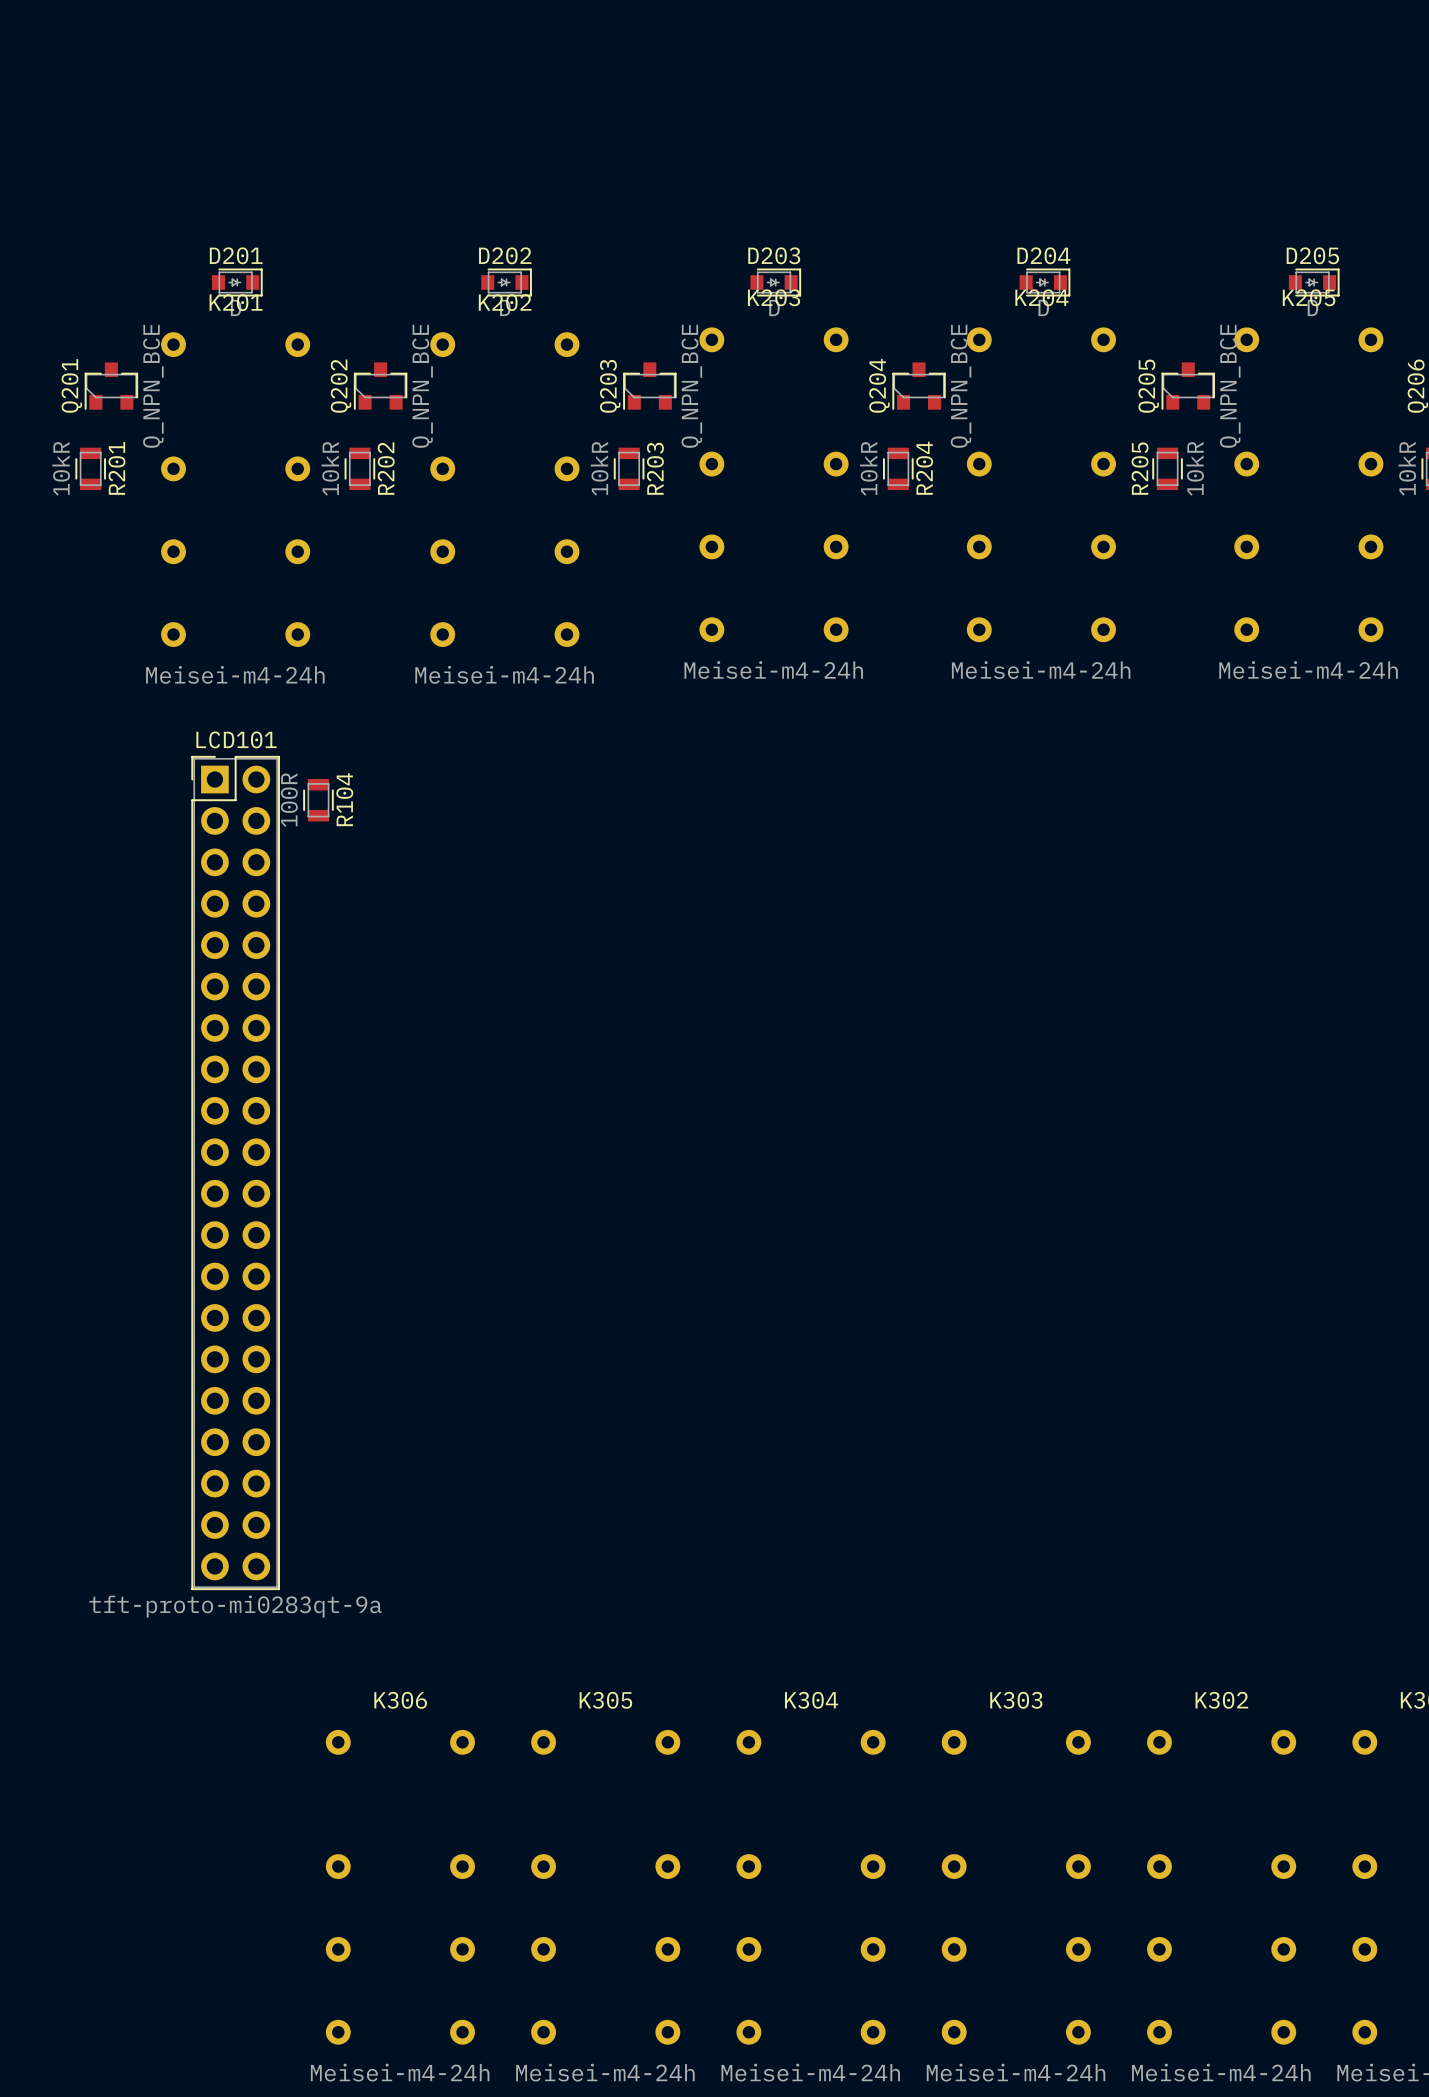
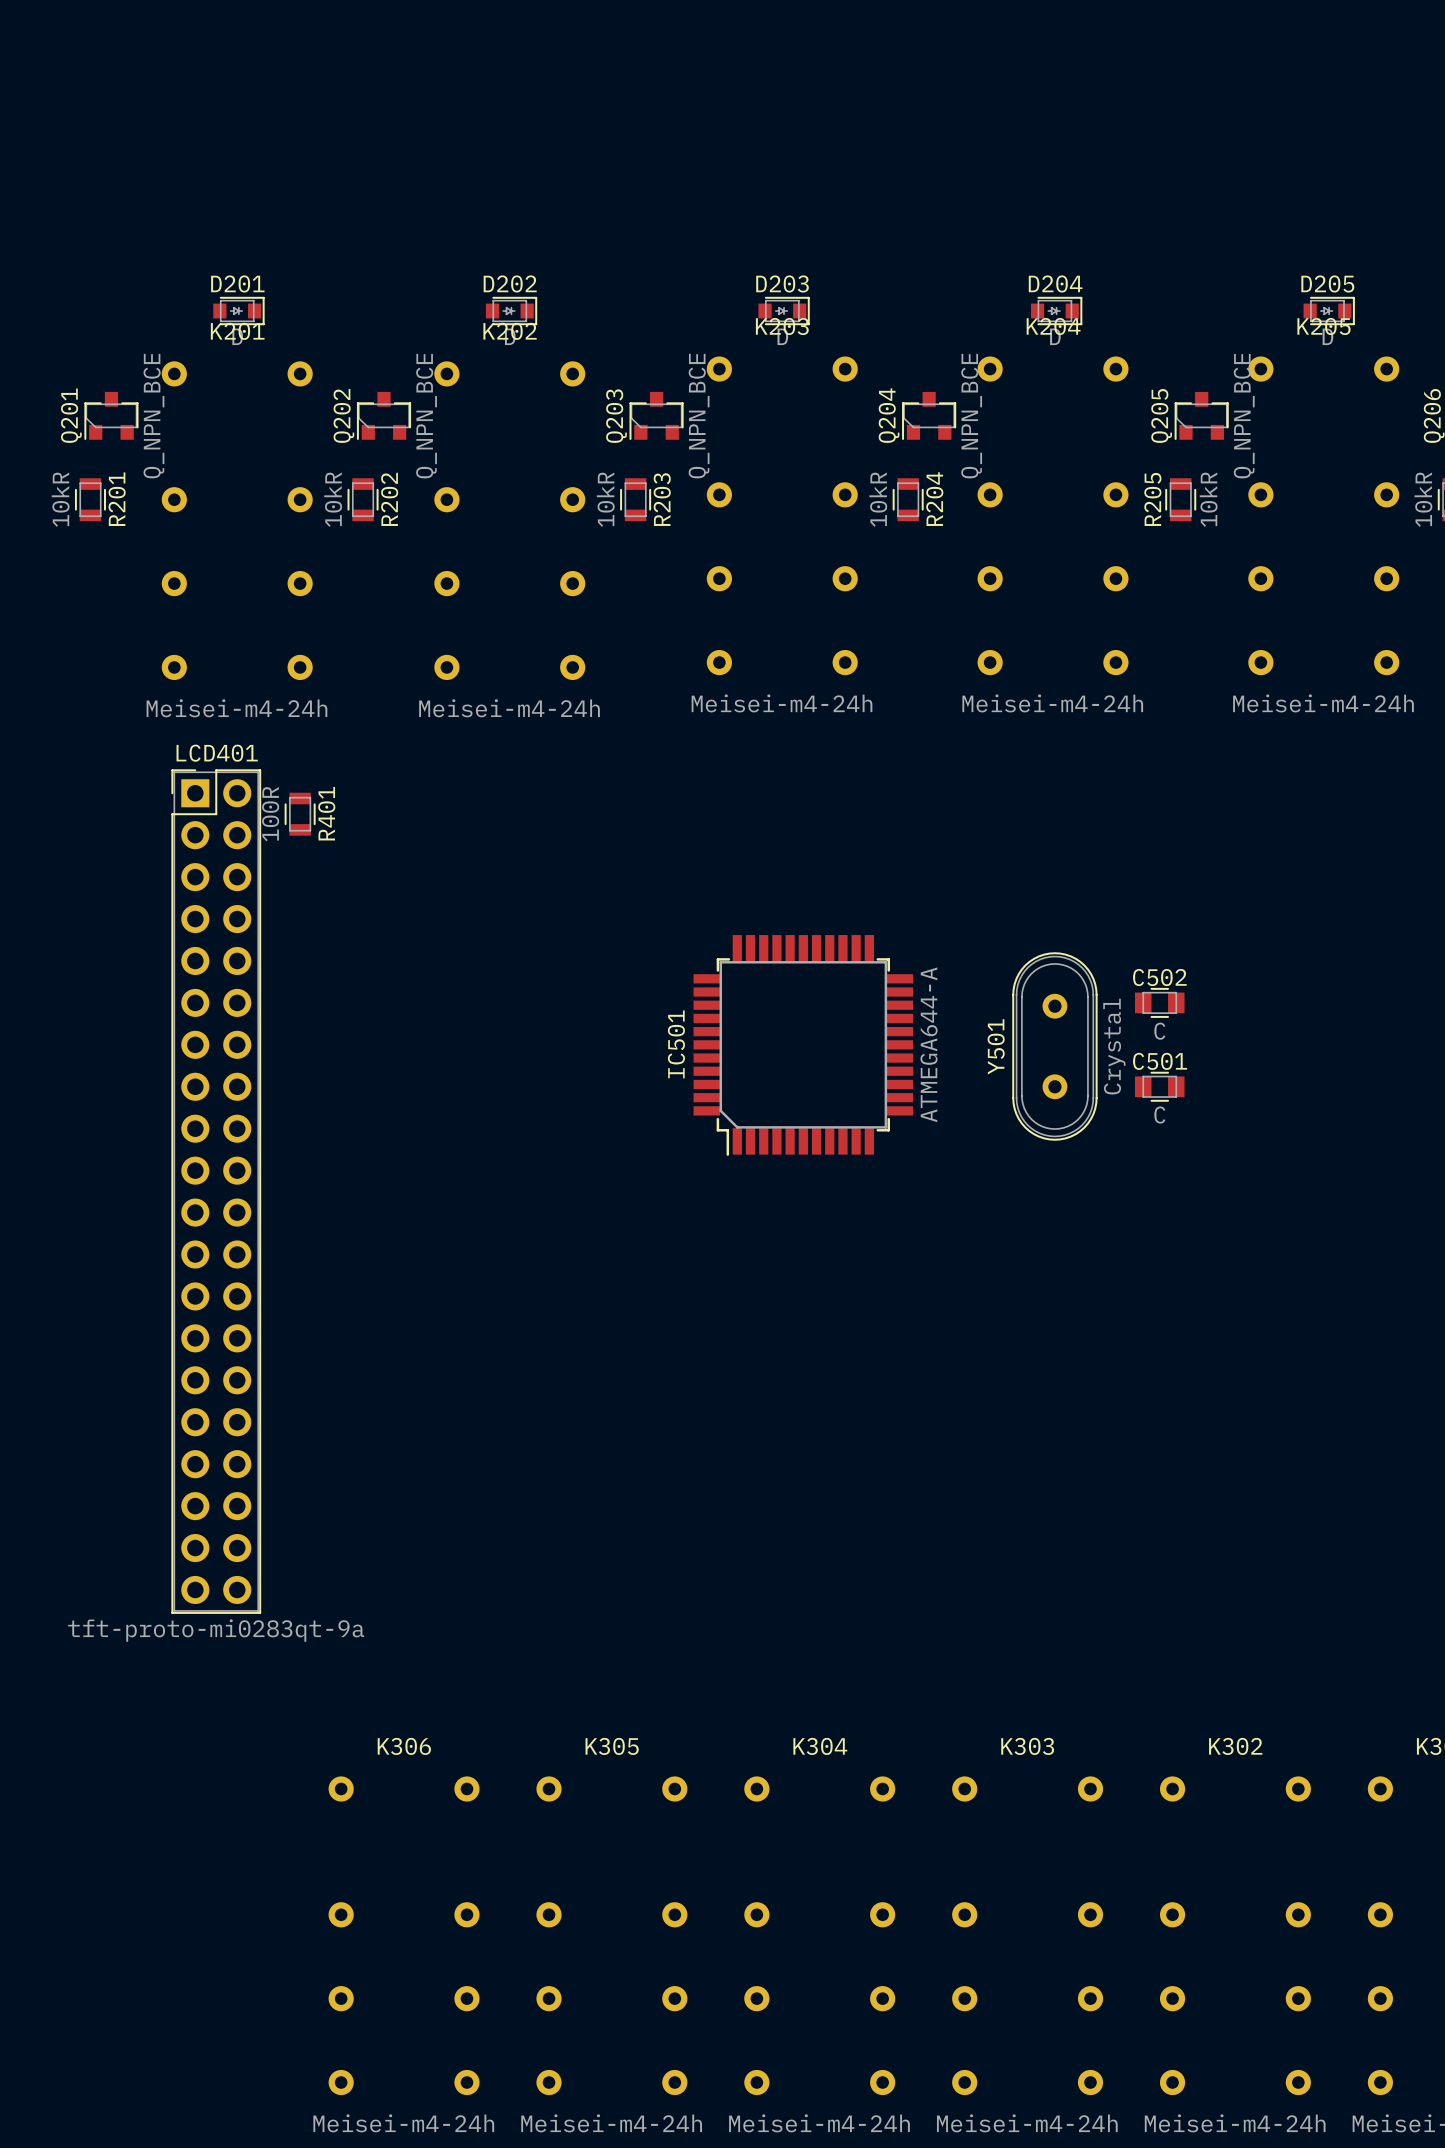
R401: none -> 100R (300, 814)
R104: 100R (318, 800) -> none
C502: none -> C (1159, 1002)
IC501: none -> ATMEGA644-A (803, 1045)
Y501: none -> Crystal (1054, 1046)
C501: none -> C (1159, 1086)
LCD401: none -> tft-proto-mi0283qt-9a (216, 1191)
LCD101: tft-proto-mi0283qt-9a (235, 1172) -> none

